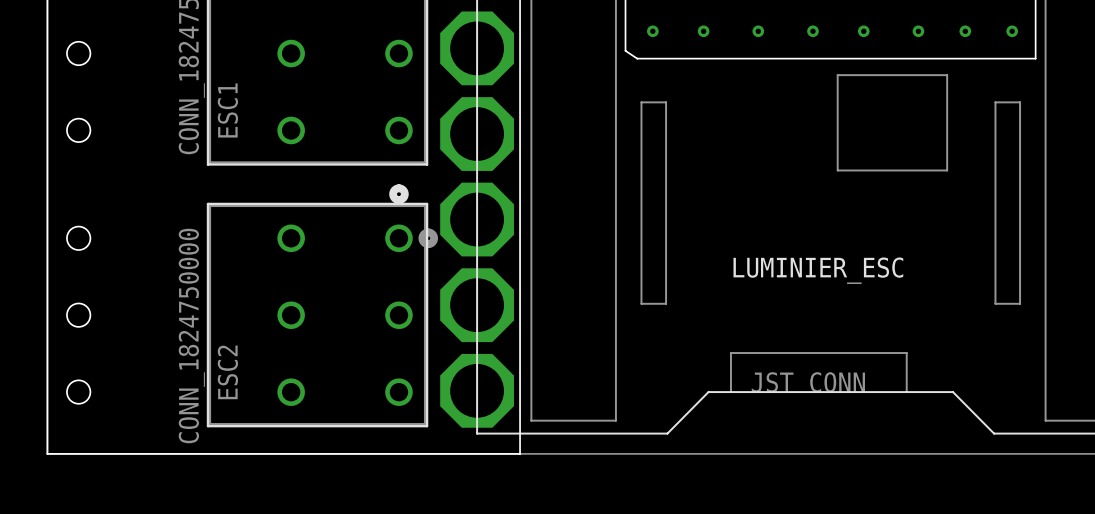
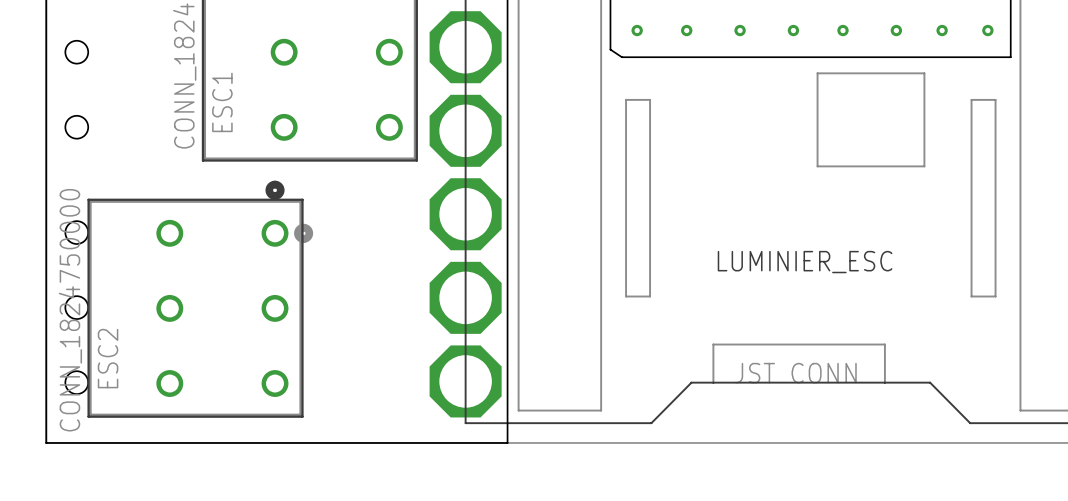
ESC2 position: (322, 305) -> (200, 299)

